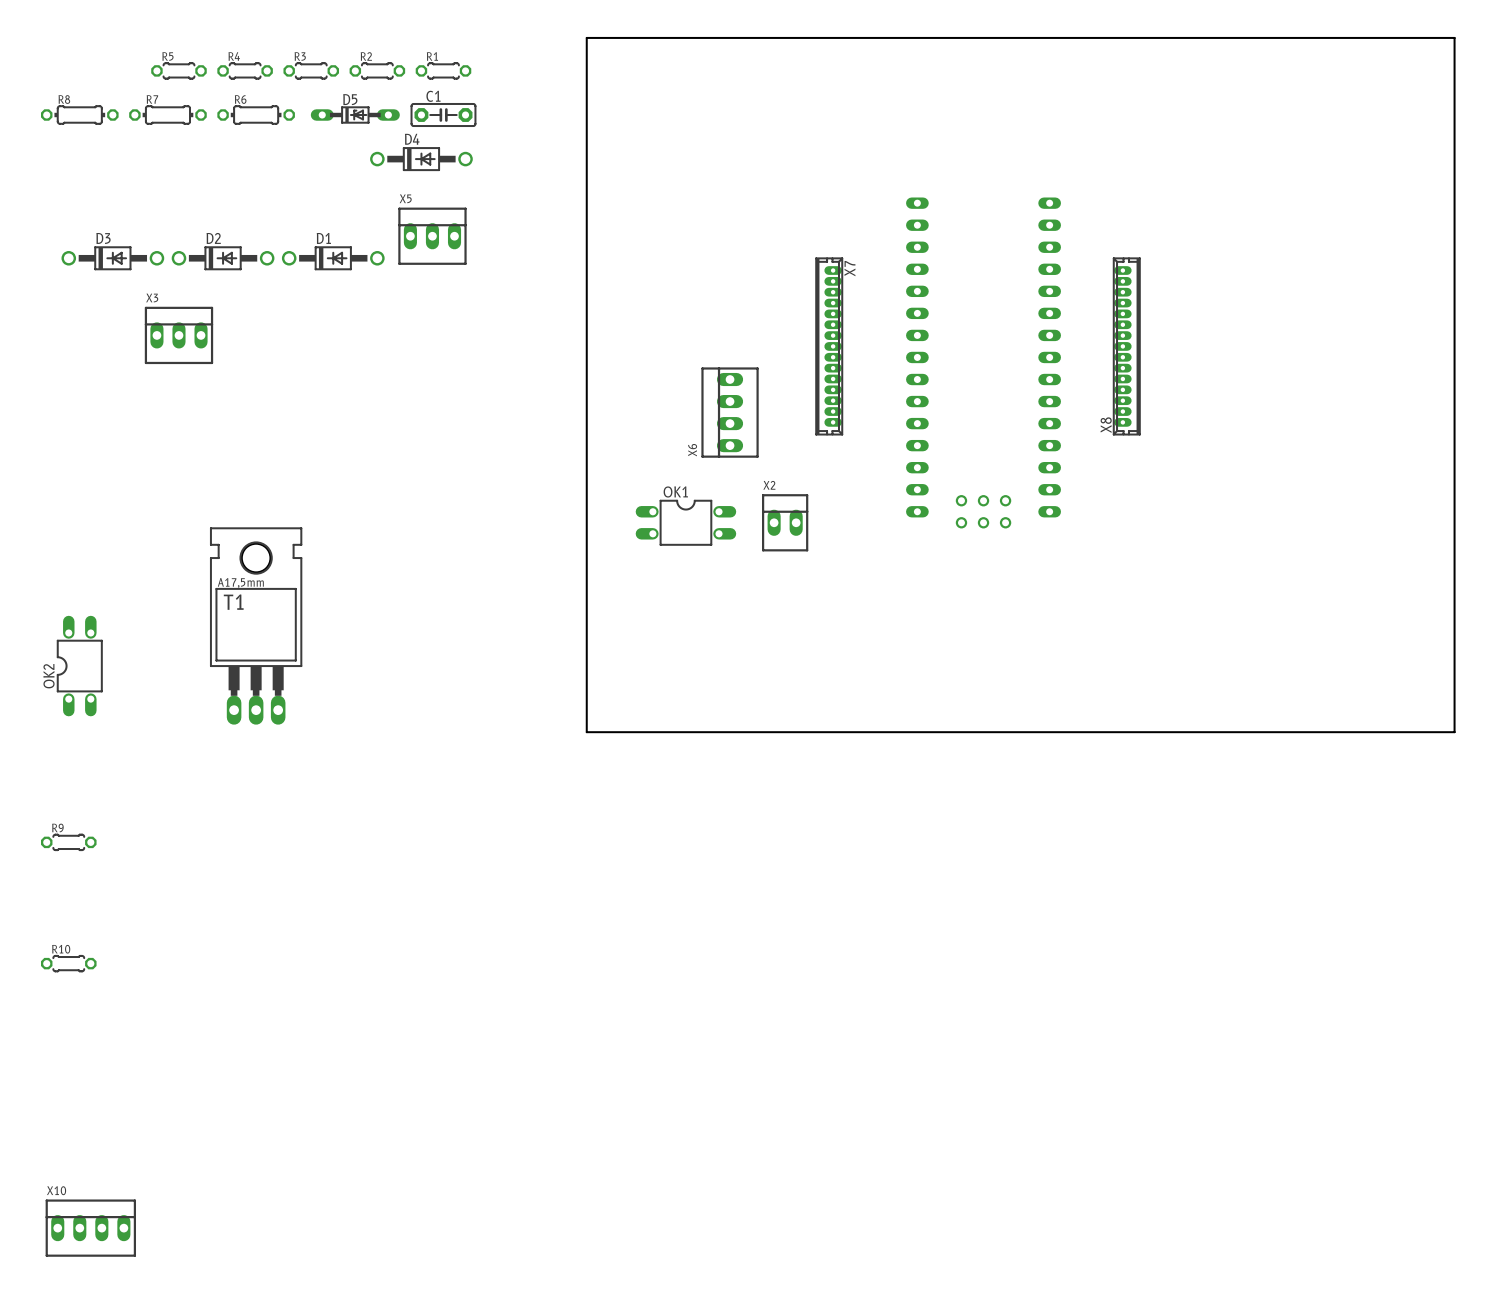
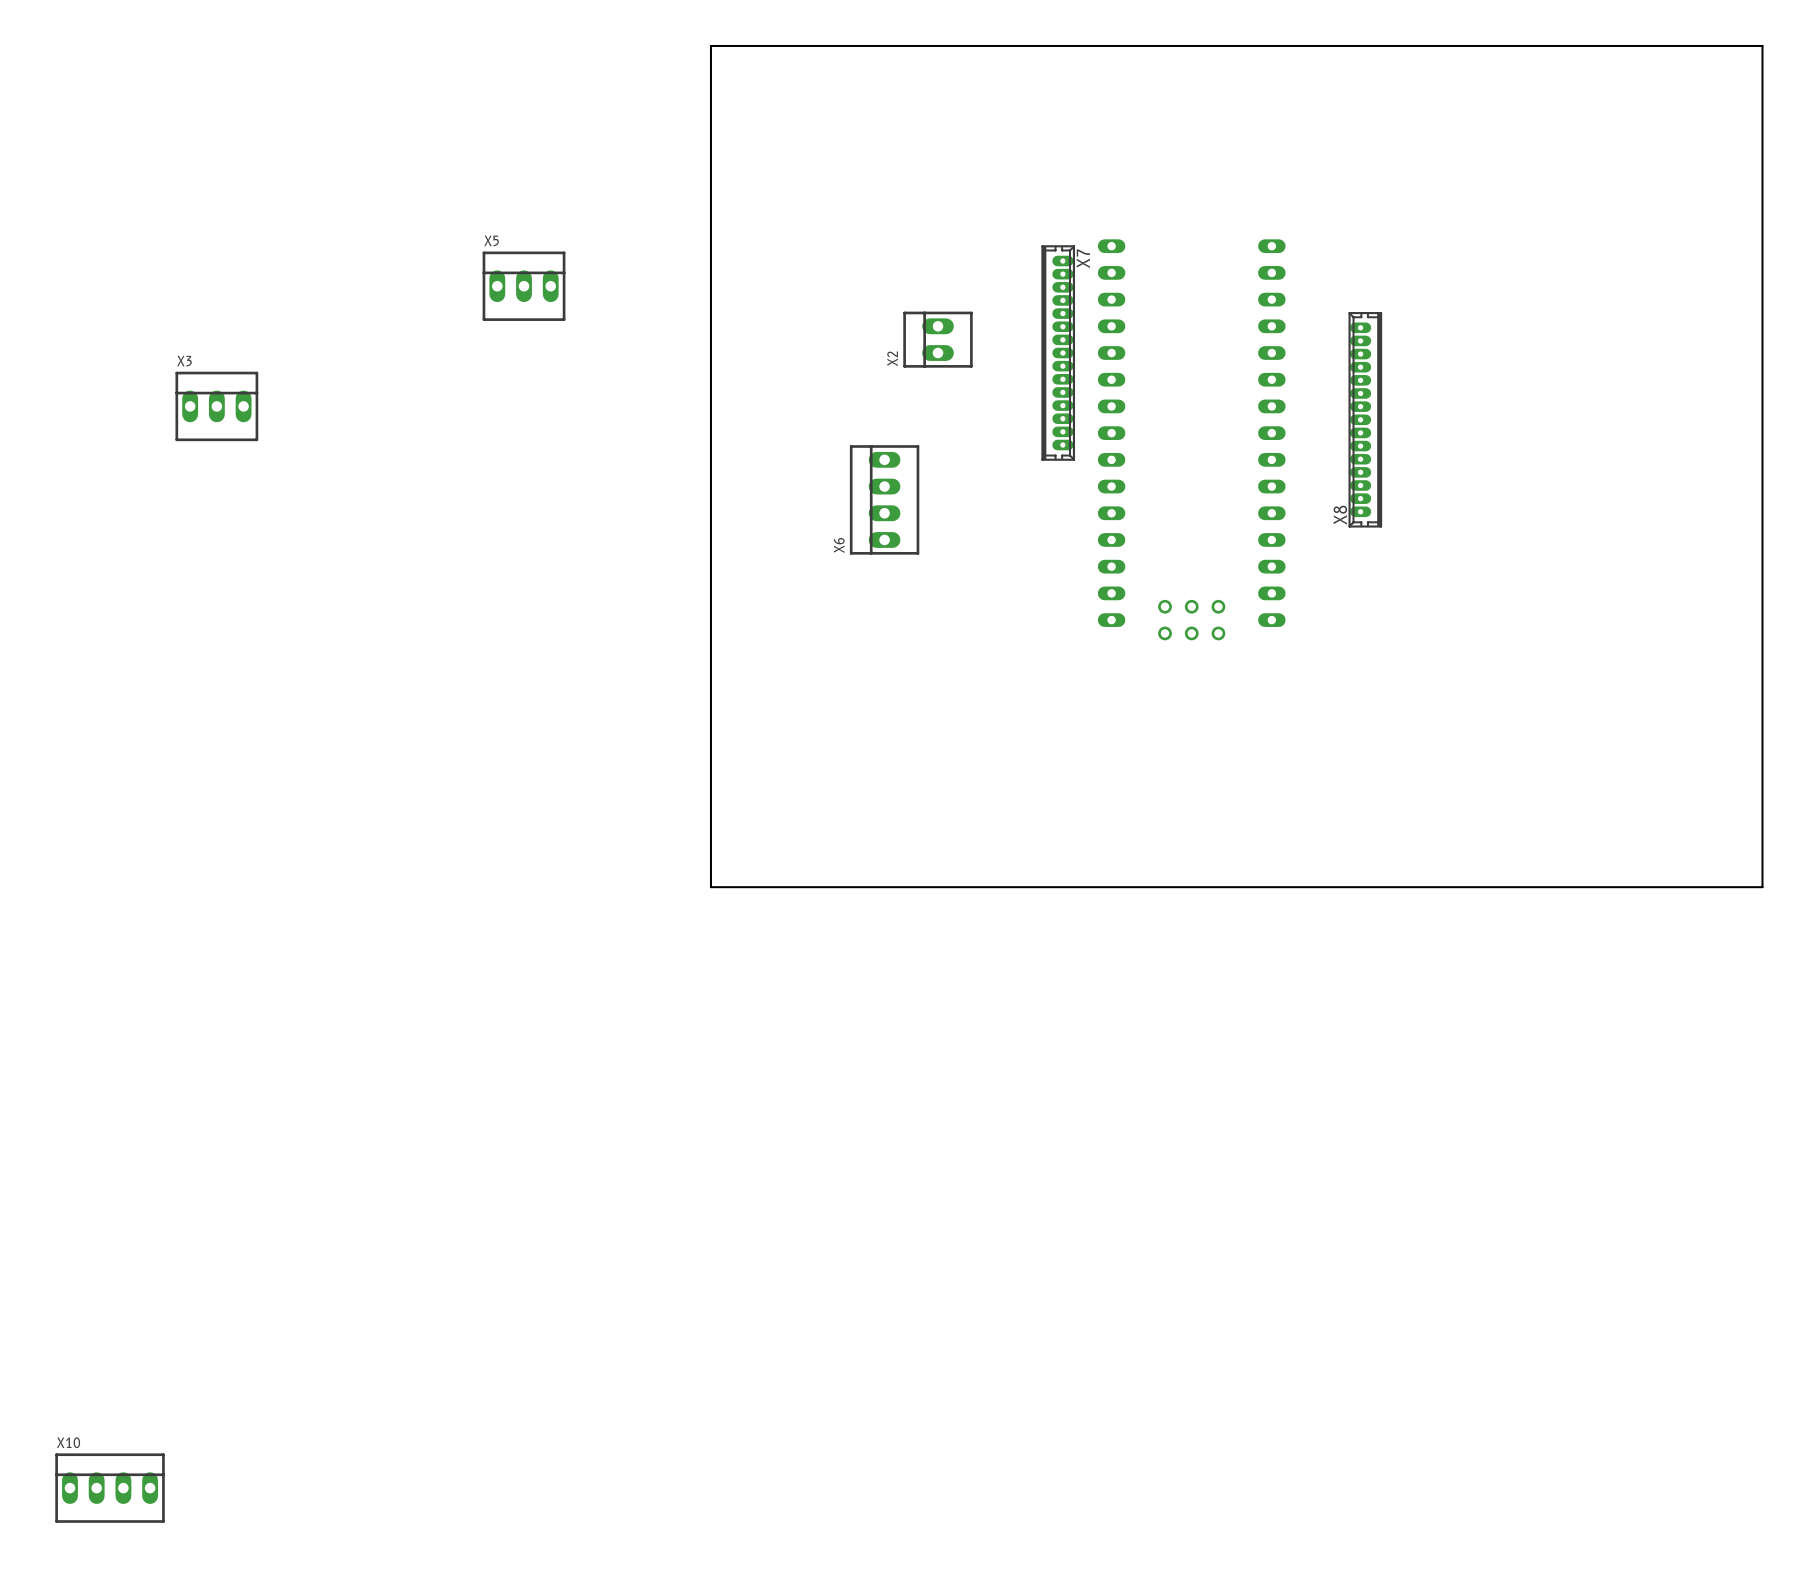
R5: (178, 70) -> none
R4: (245, 70) -> none
R3: (311, 70) -> none
R2: (377, 70) -> none
R1: (443, 70) -> none
R8: (79, 115) -> none
R7: (167, 115) -> none
R6: (256, 115) -> none
D5: (355, 115) -> none
C1: (443, 115) -> none
D4: (421, 159) -> none
D3: (112, 258) -> none
D2: (223, 258) -> none
D1: (333, 258) -> none
X7 position: (829, 346) -> (1058, 353)
OK1: (685, 522) -> none
X2 rotation: 0° (785, 522) -> 90° counterclockwise (937, 339)
X2 position: (785, 522) -> (937, 339)
T1: (256, 626) -> none
OK2: (79, 666) -> none
R9: (68, 842) -> none
R10: (68, 963) -> none

